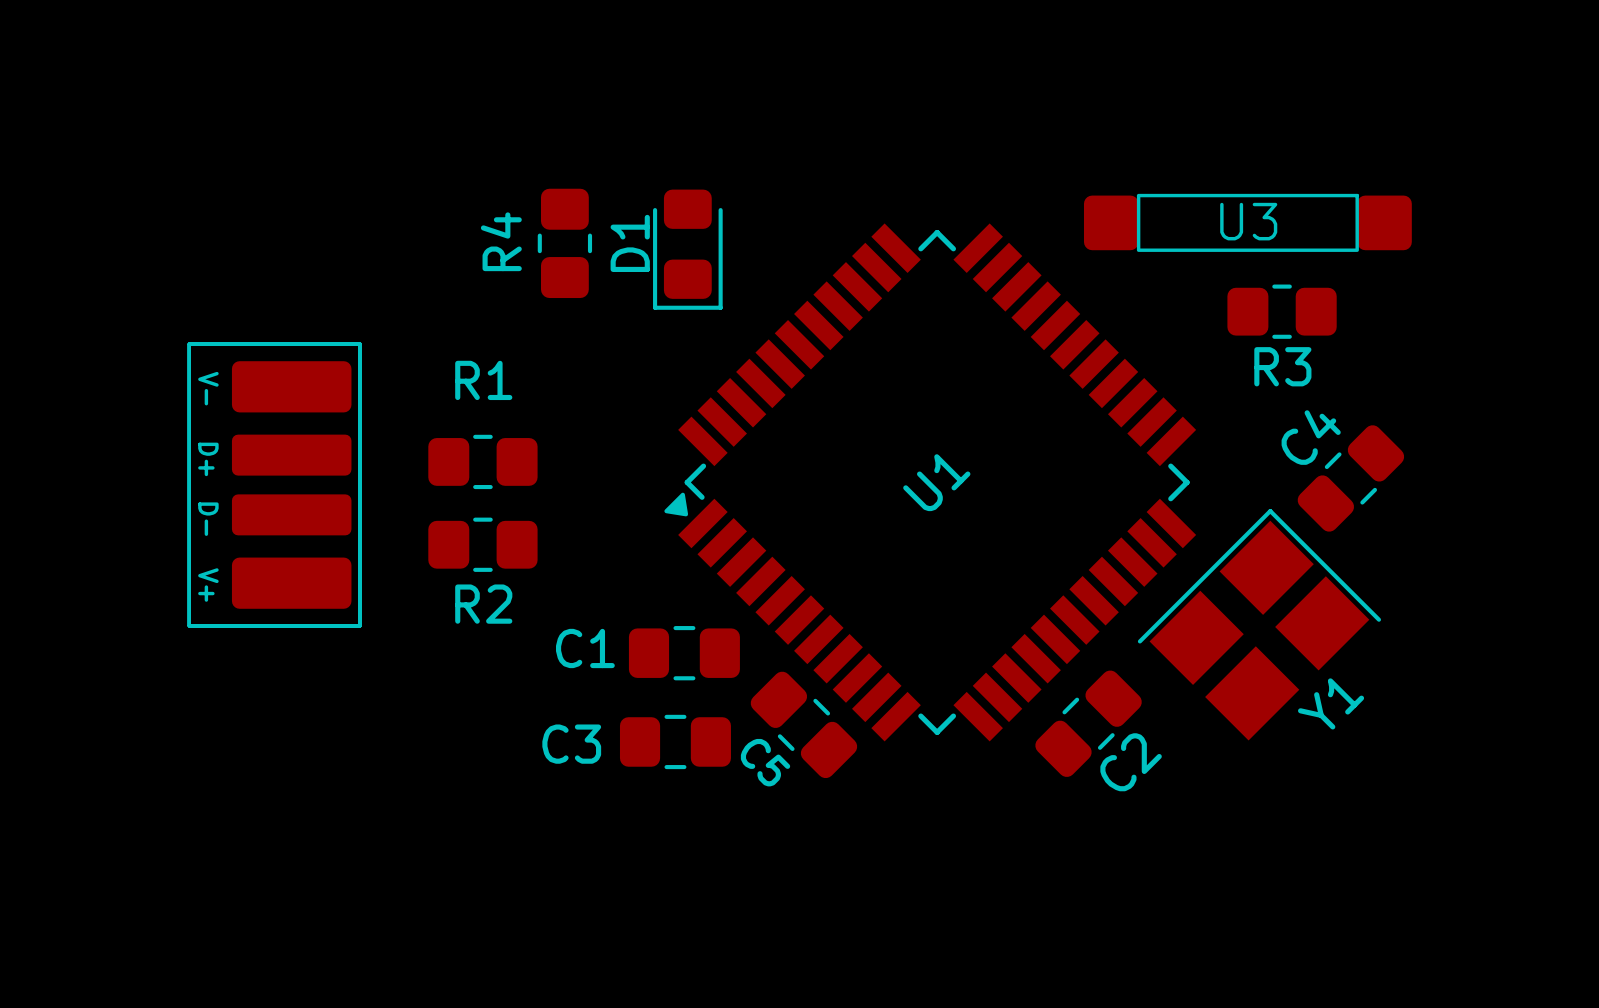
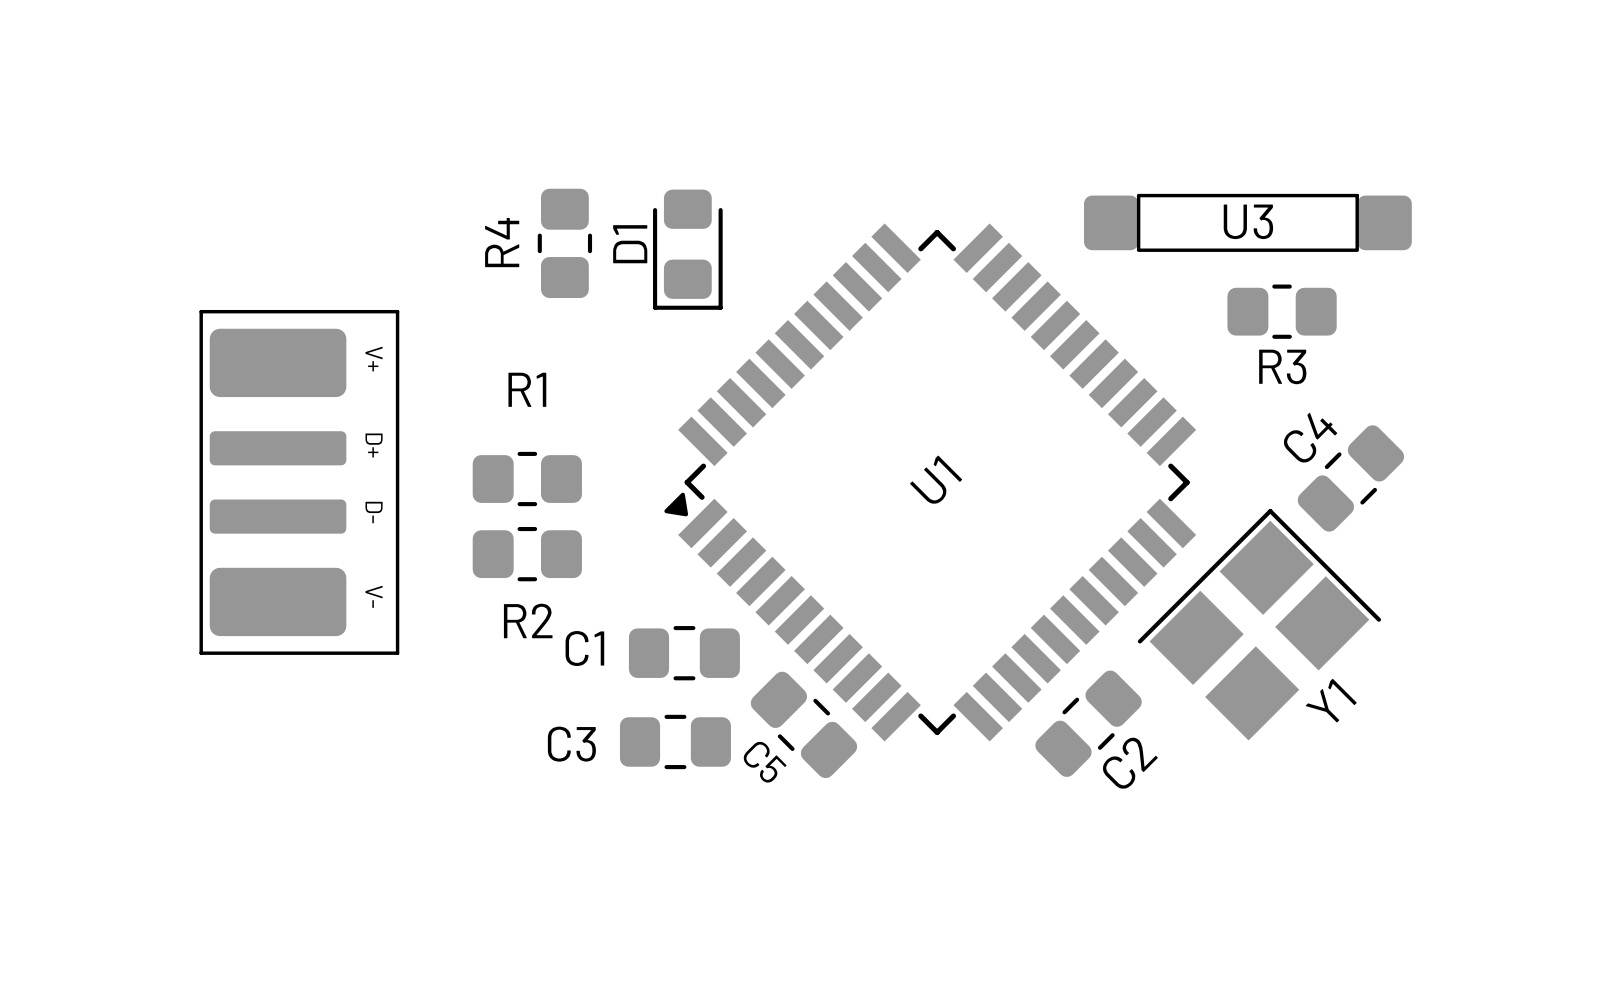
part footprint: [187, 342, 362, 628] -> [199, 309, 400, 655]
R2 position: (482, 461) -> (527, 479)
R1 position: (482, 544) -> (527, 554)

